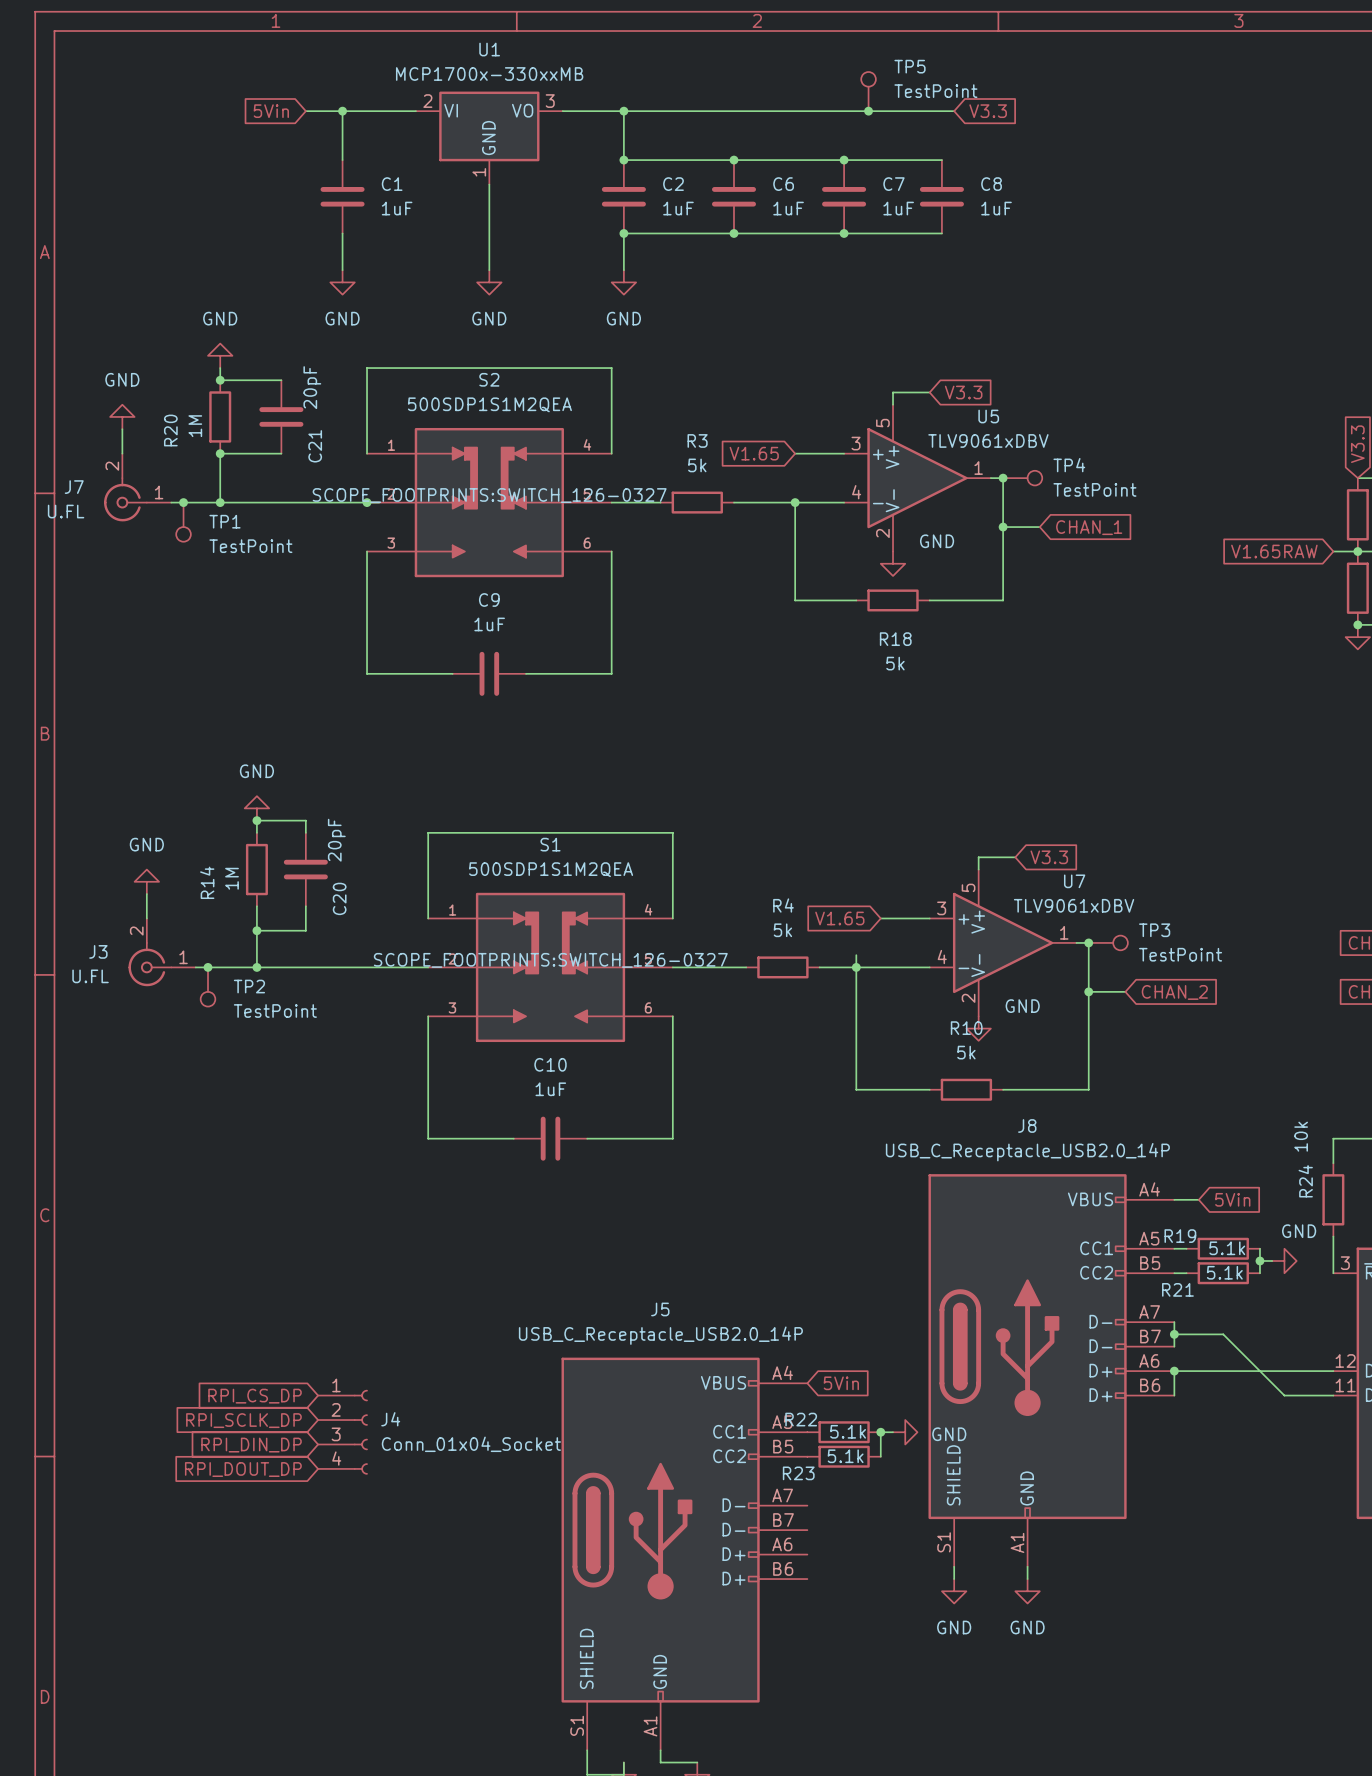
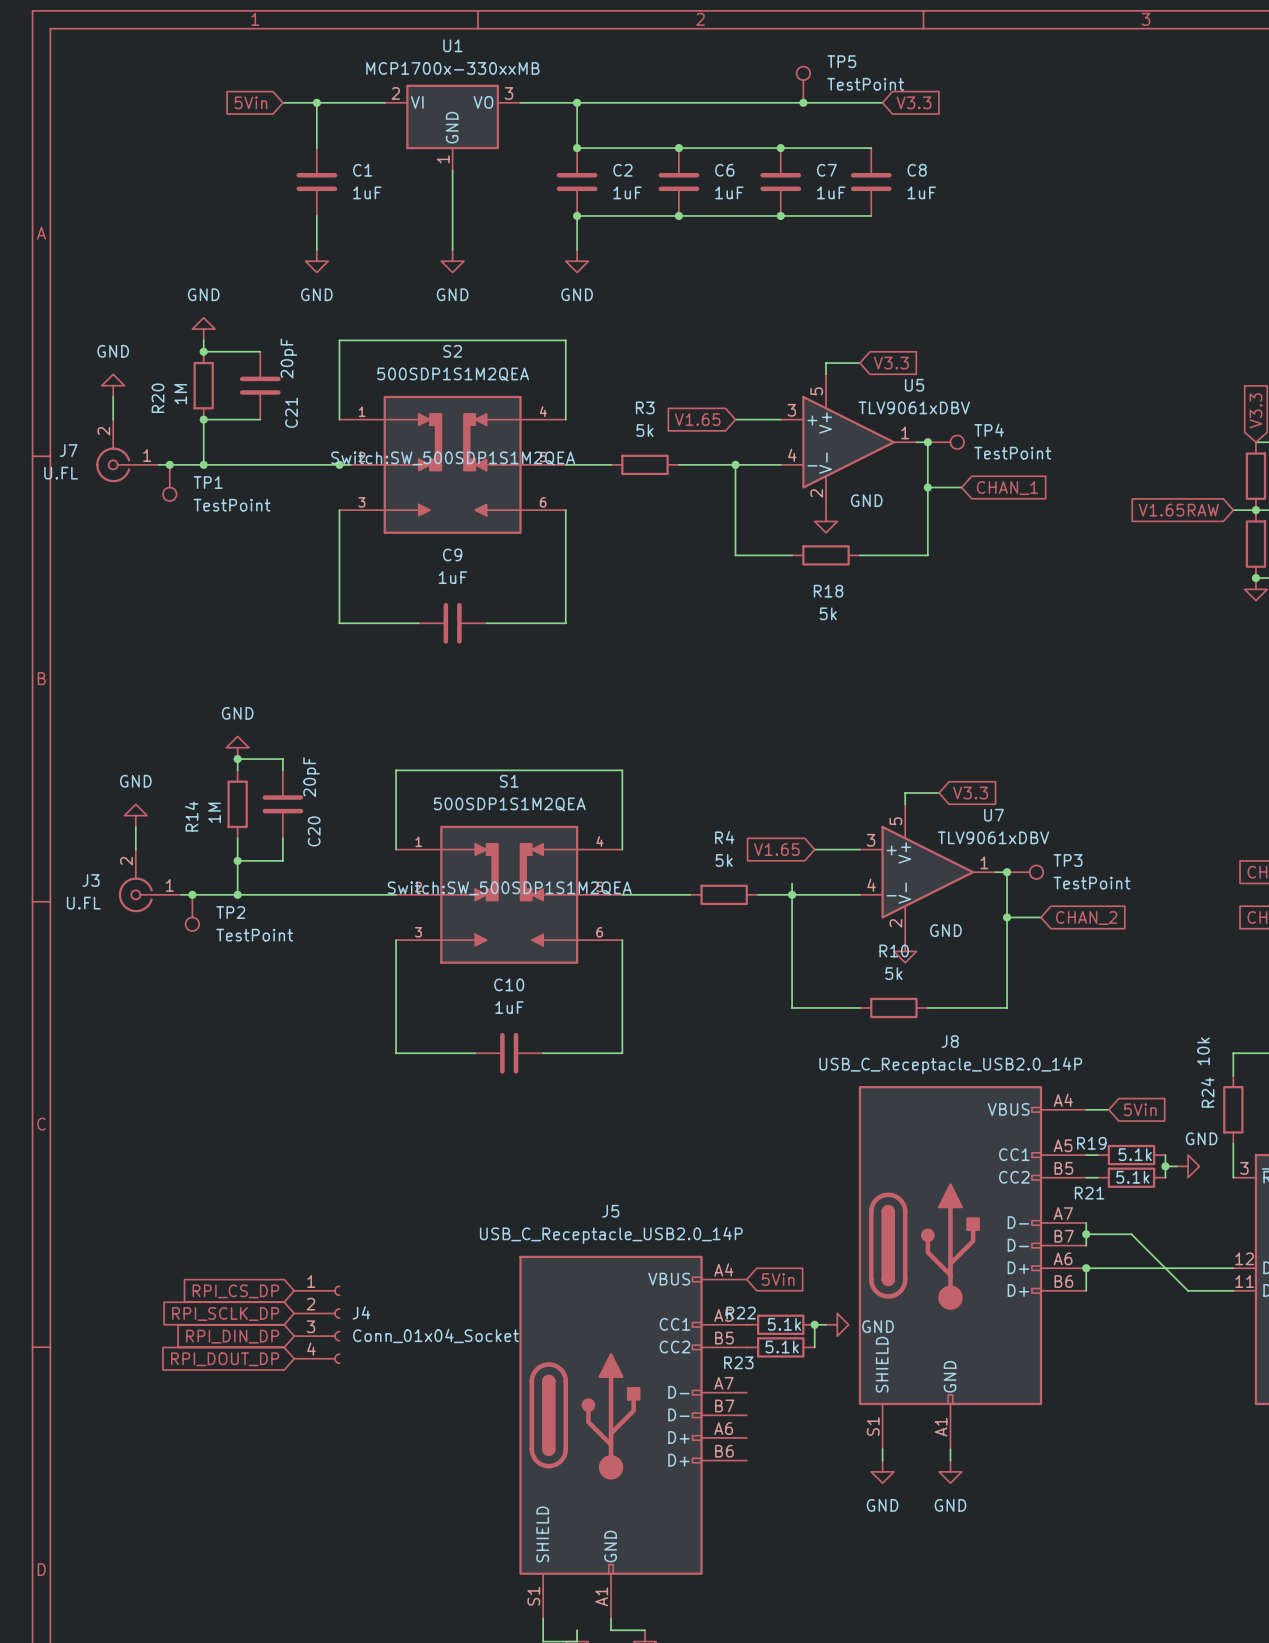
S2 text: SCOPE_FOOTPRINTS:SWITCH_126-0327 (489, 495) -> Switch:SW_500SDP1S1M2QEA (453, 458)
S1 text: SCOPE_FOOTPRINTS:SWITCH_126-0327 (550, 960) -> Switch:SW_500SDP1S1M2QEA (509, 888)

